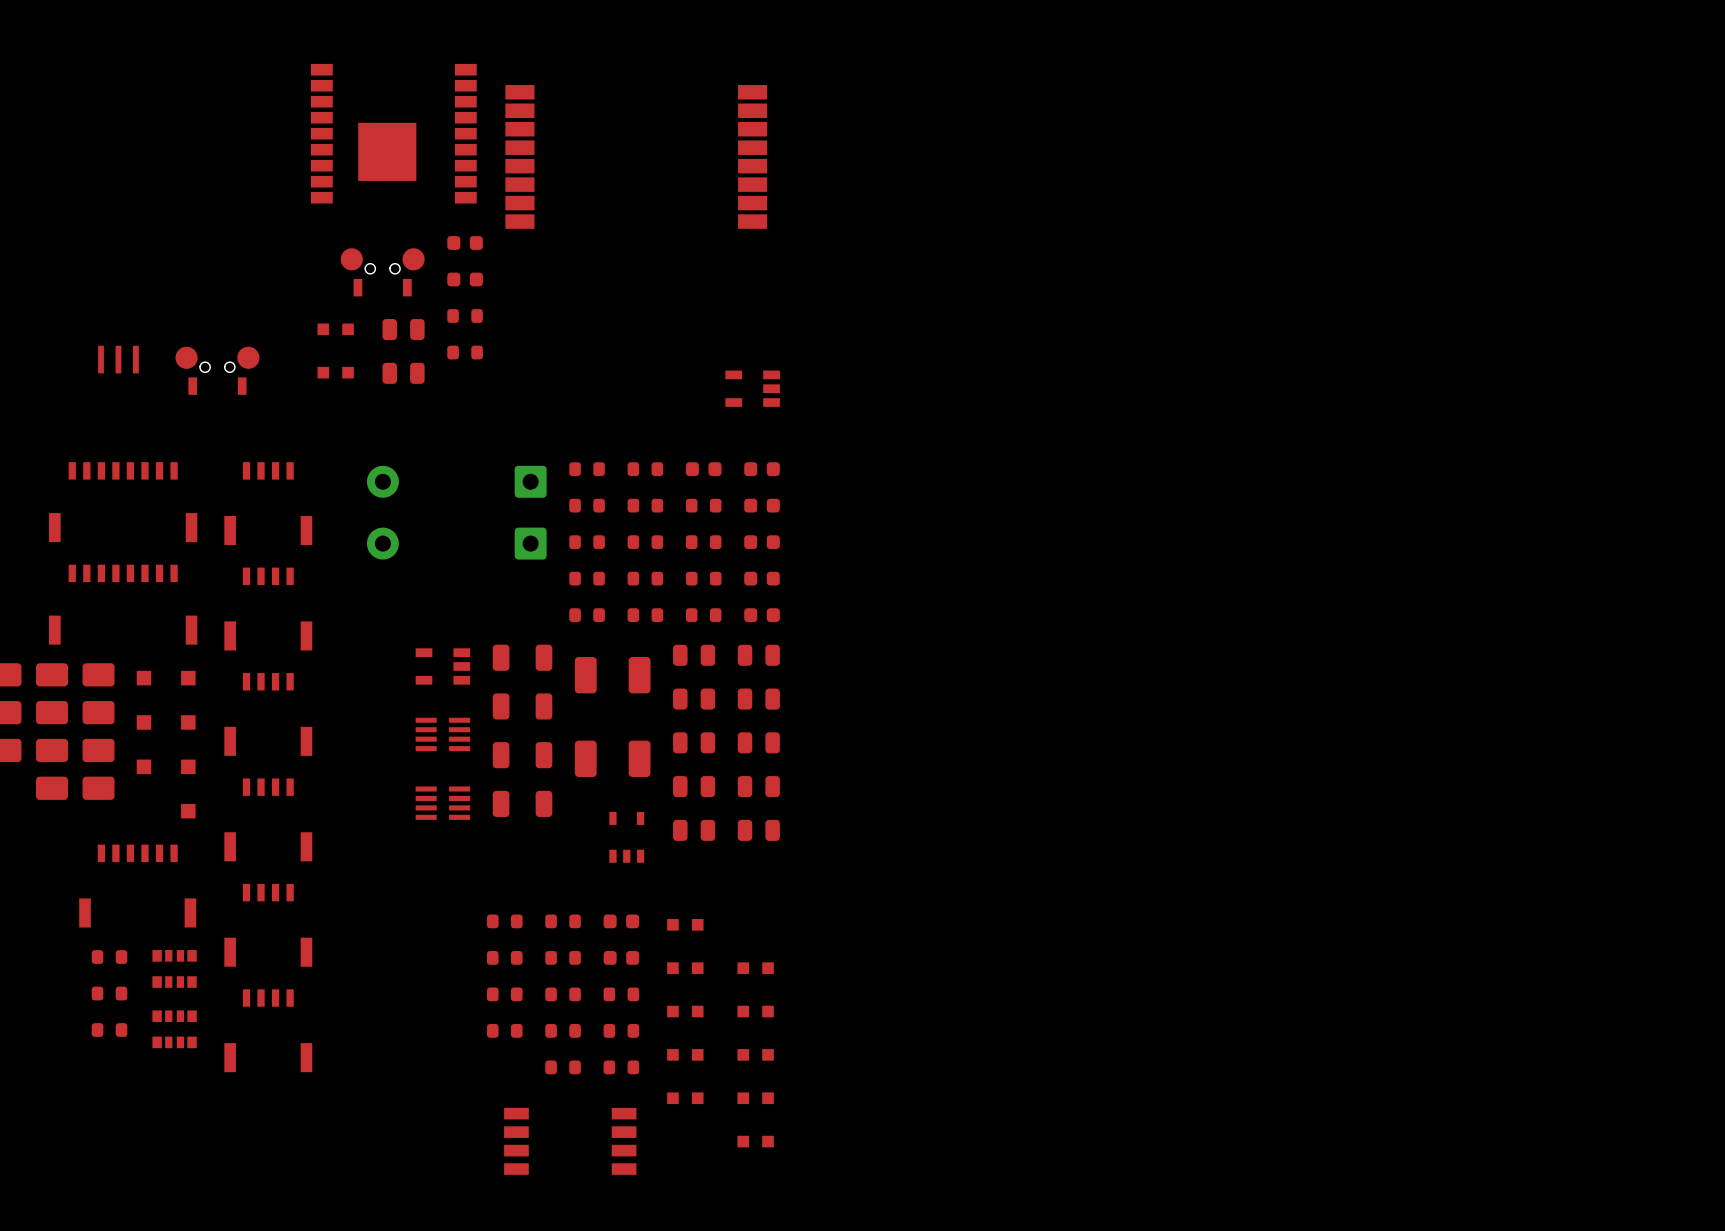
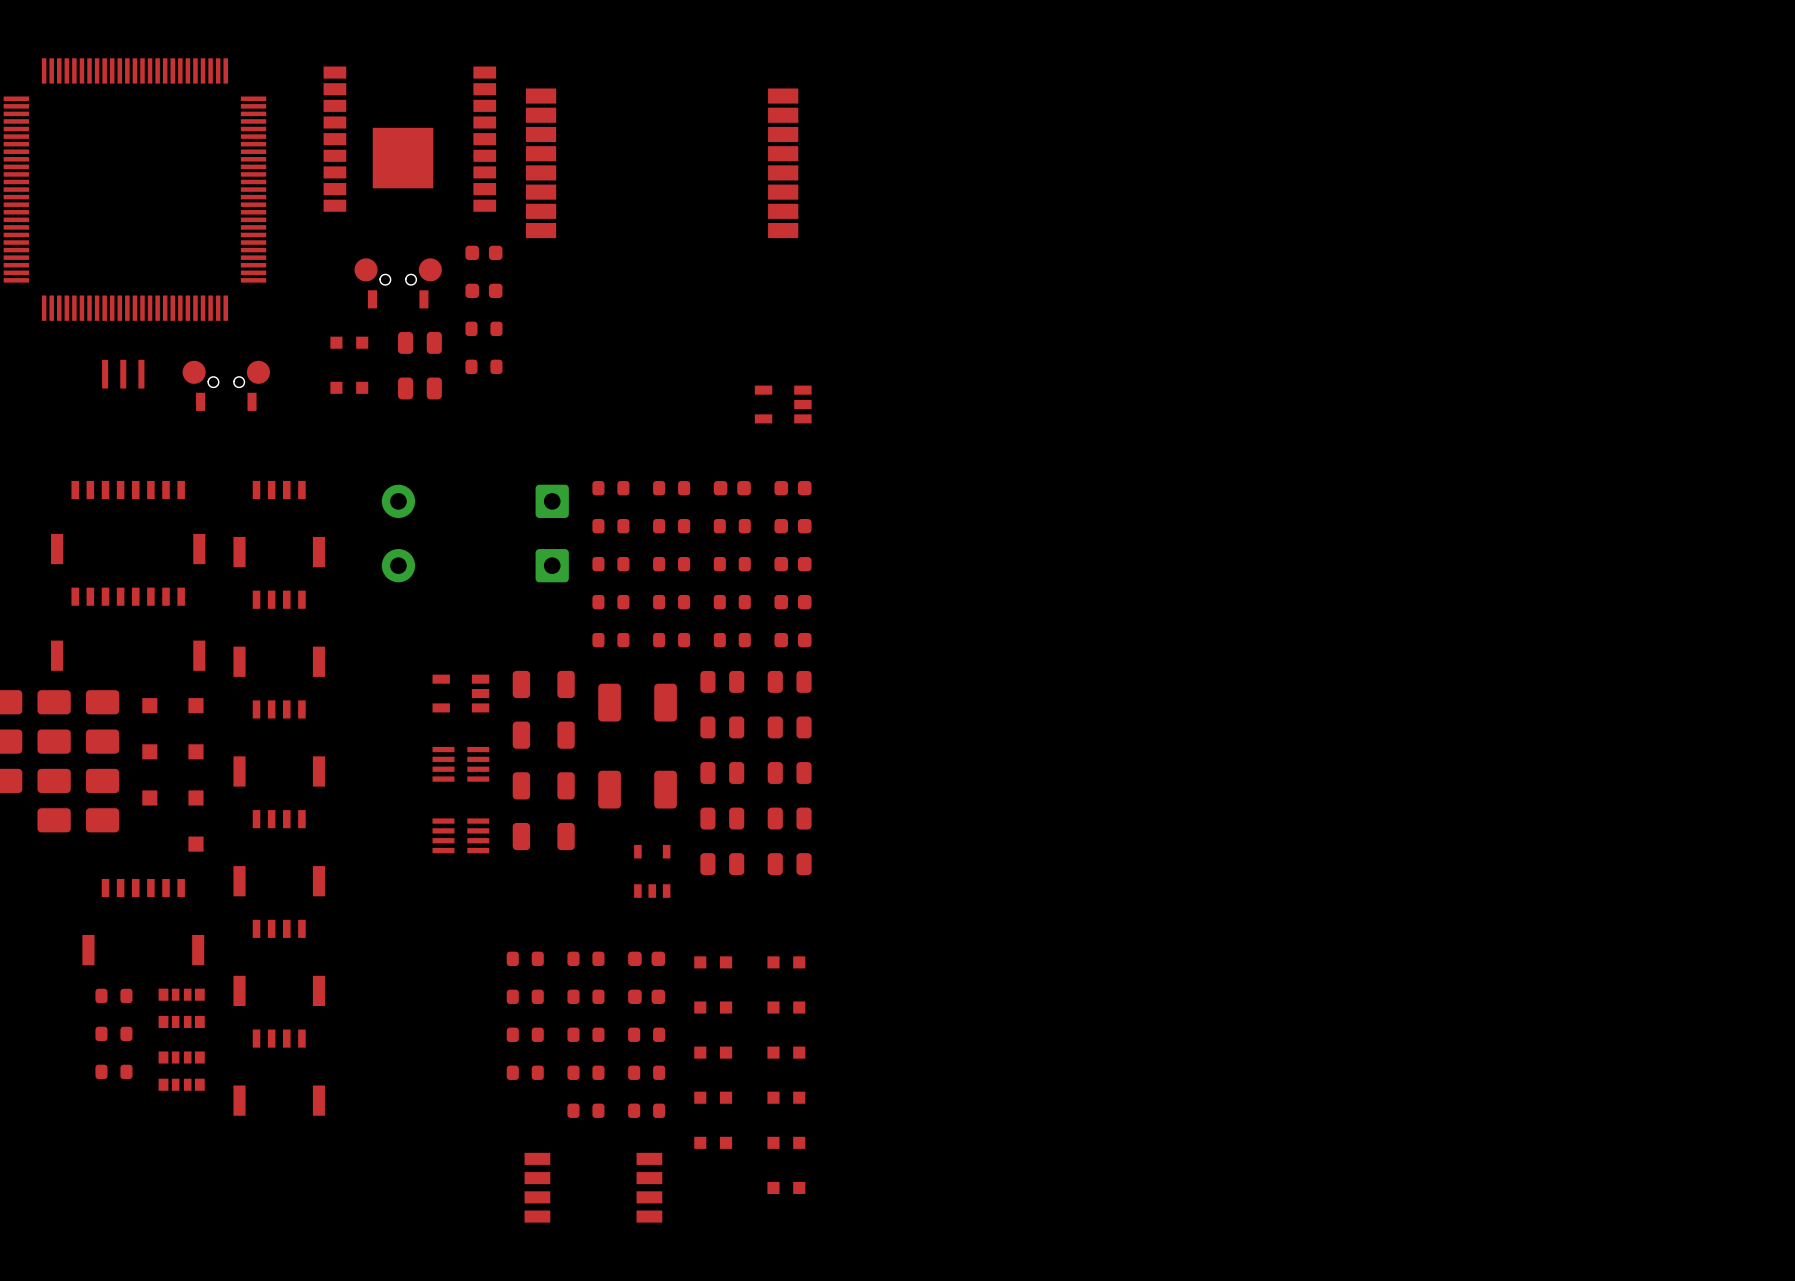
part: none -> (134, 189)
part: none -> (786, 962)

